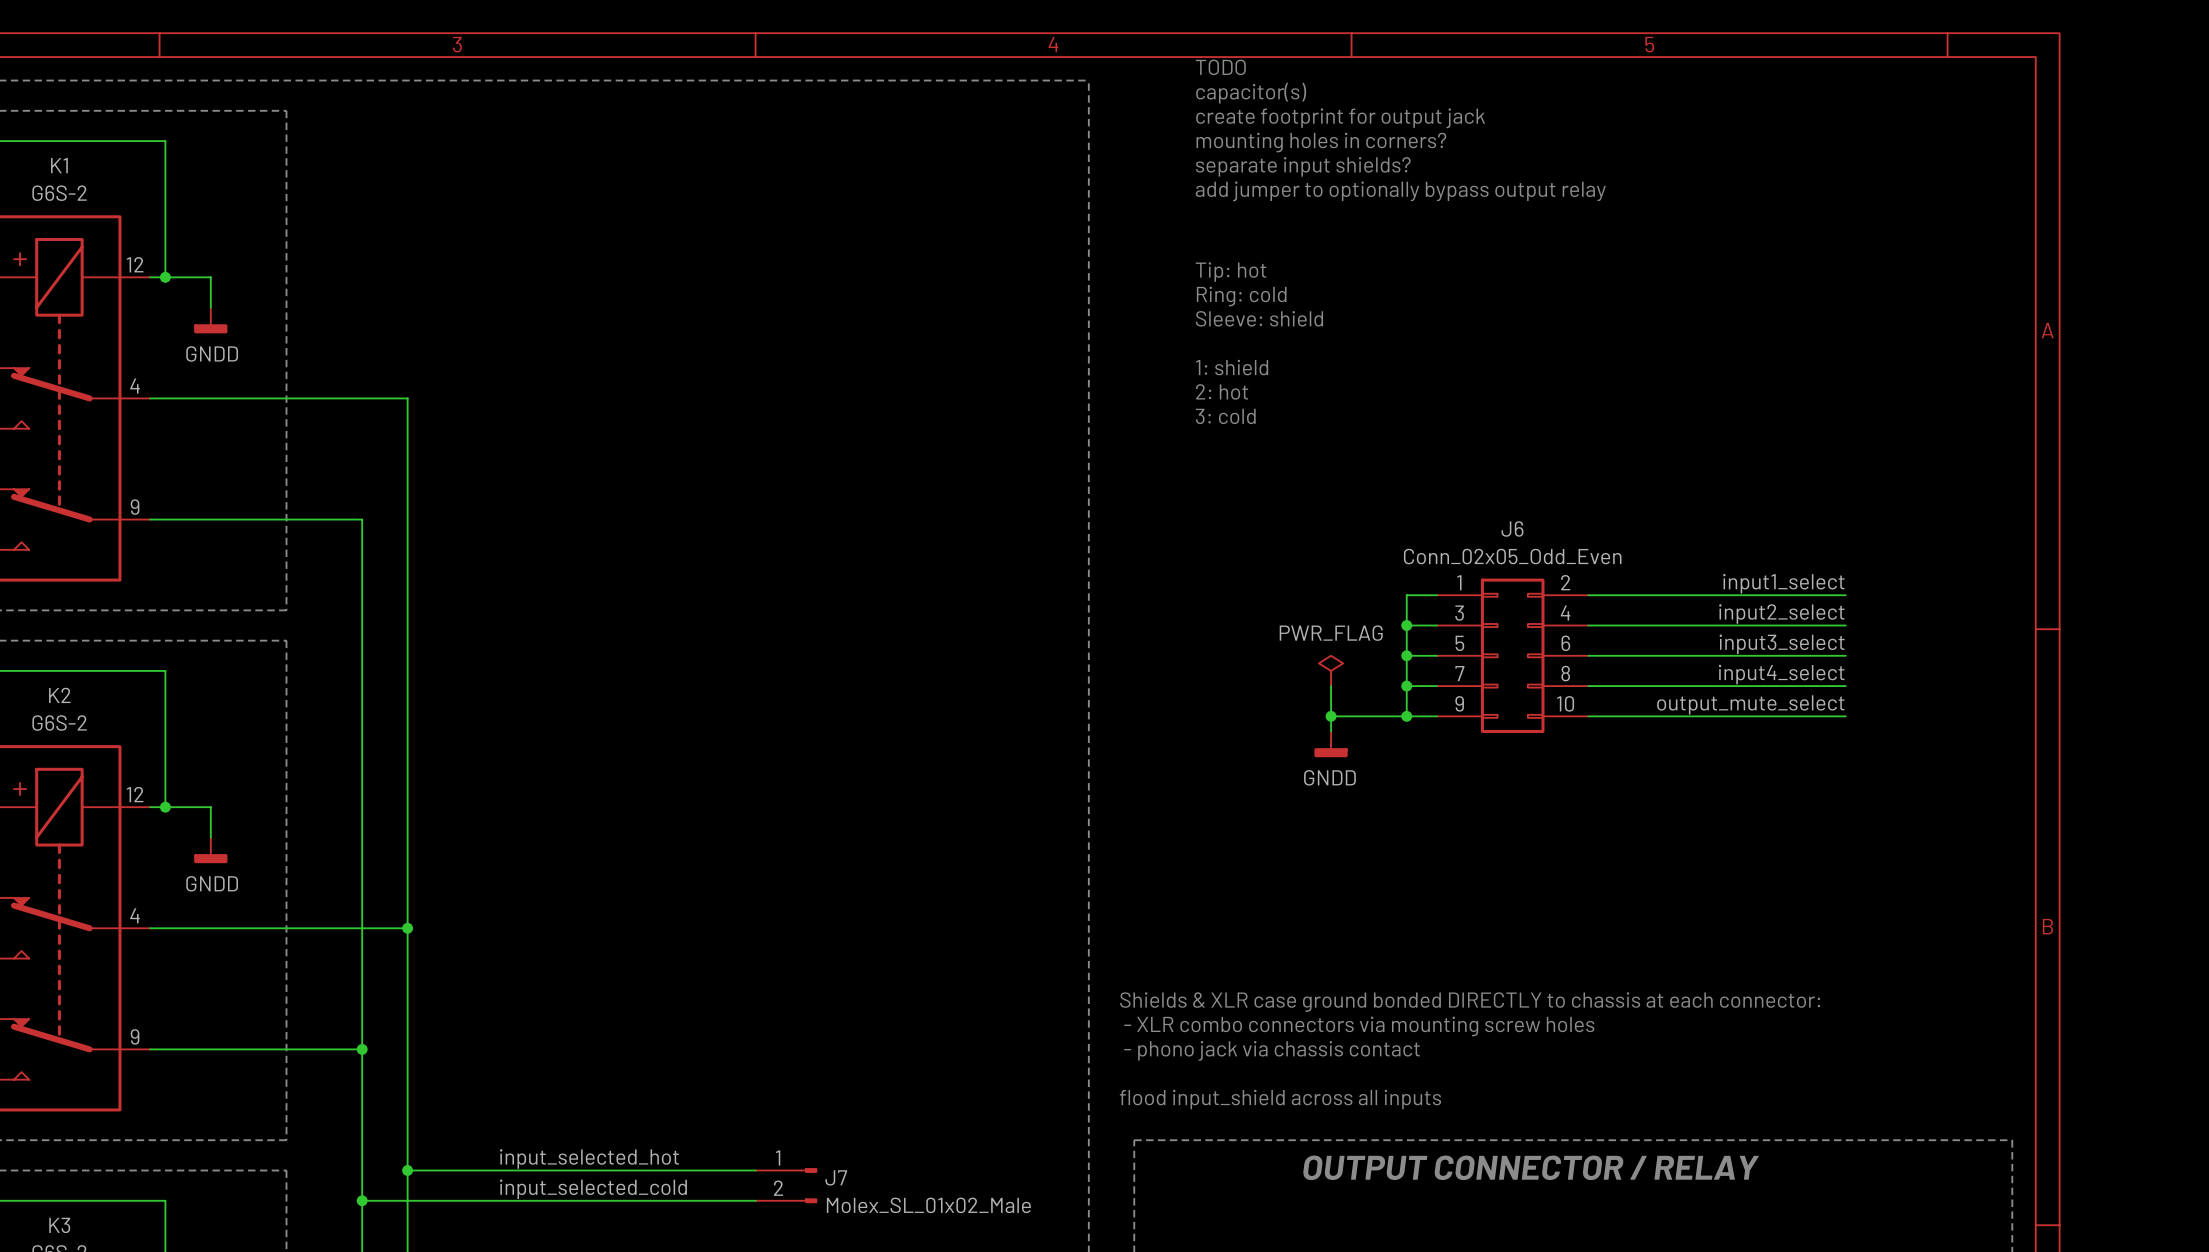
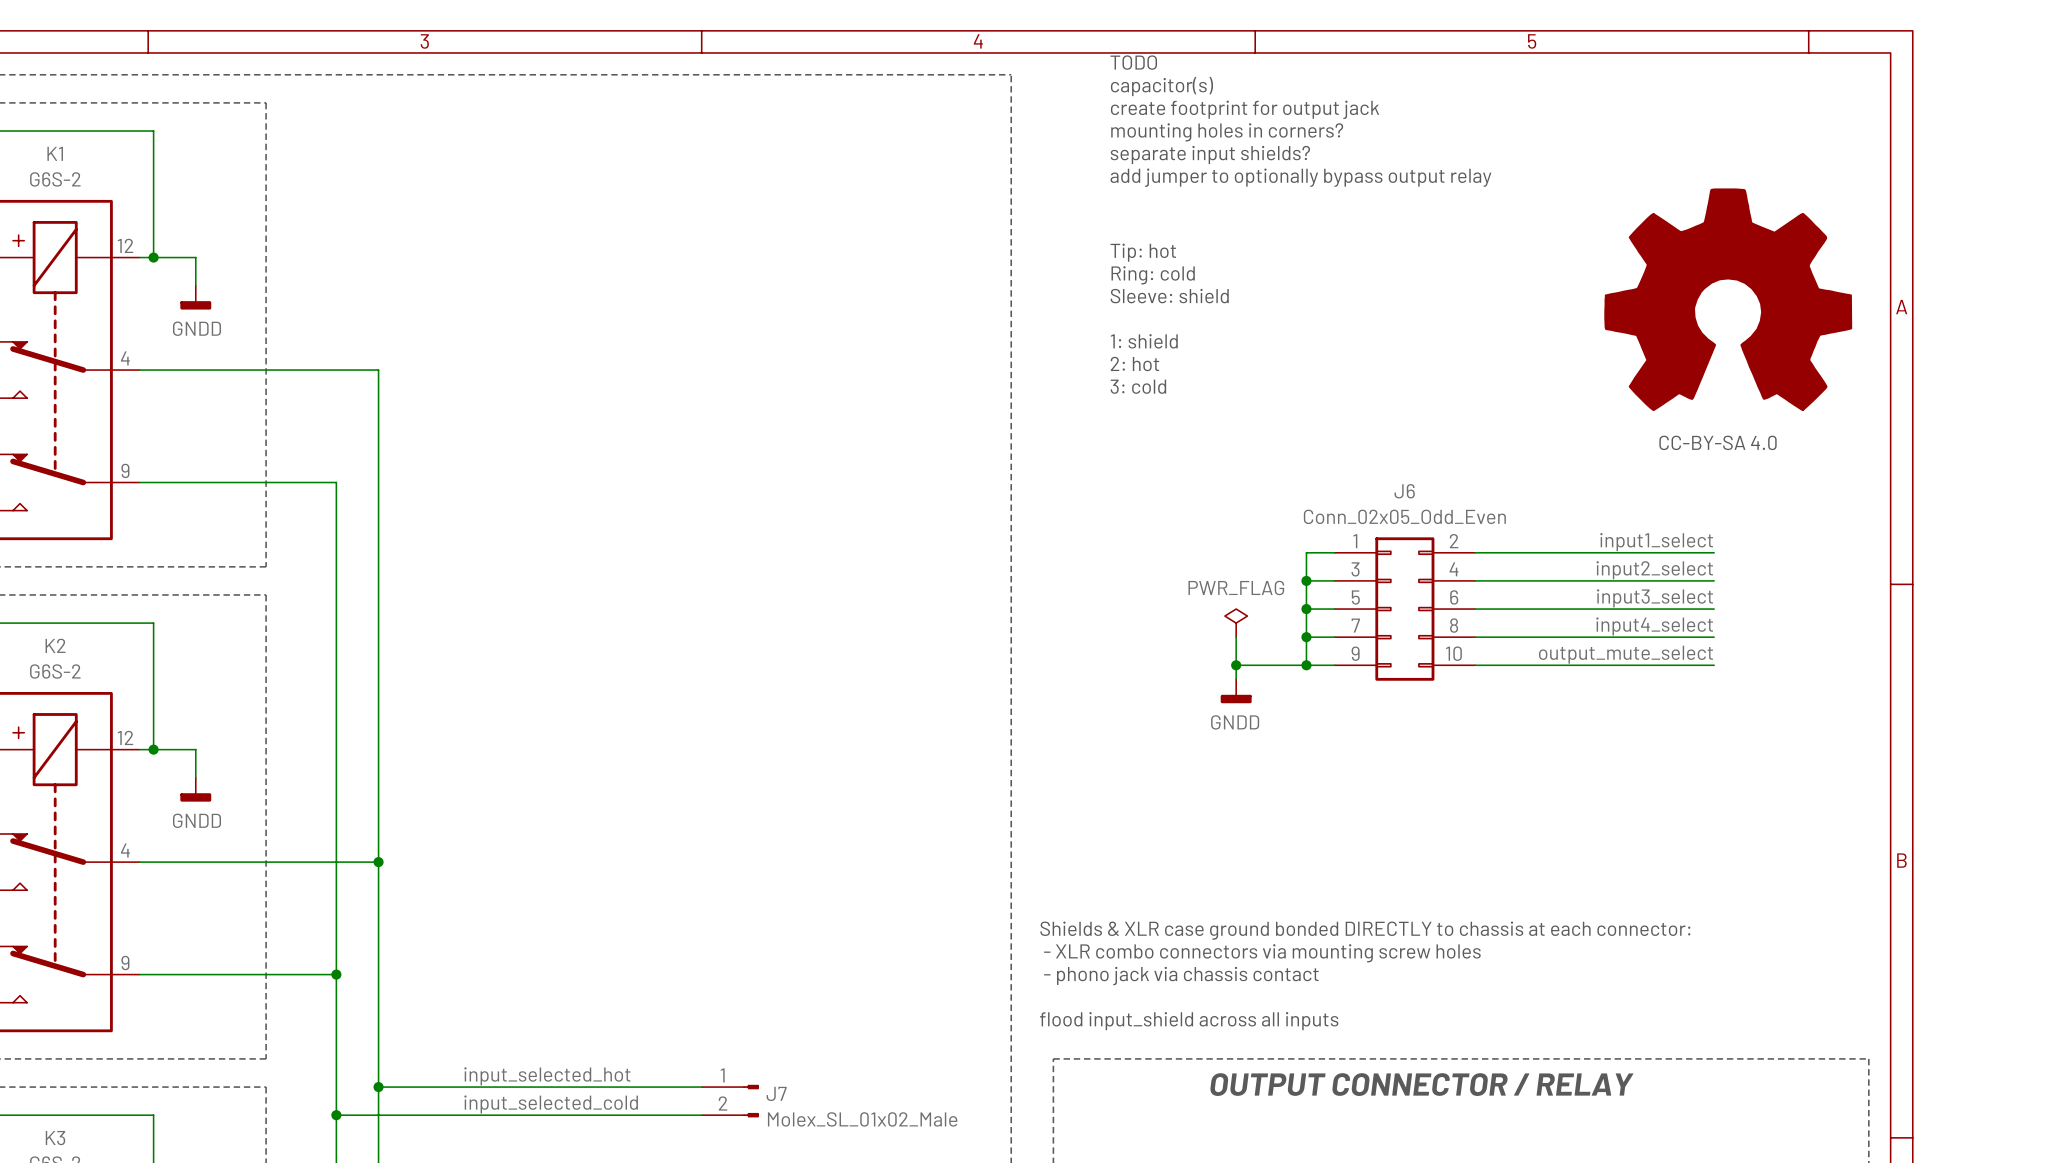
power symbol: none -> (1728, 299)
text: none -> CC-BY-SA 4.0 (1718, 442)

